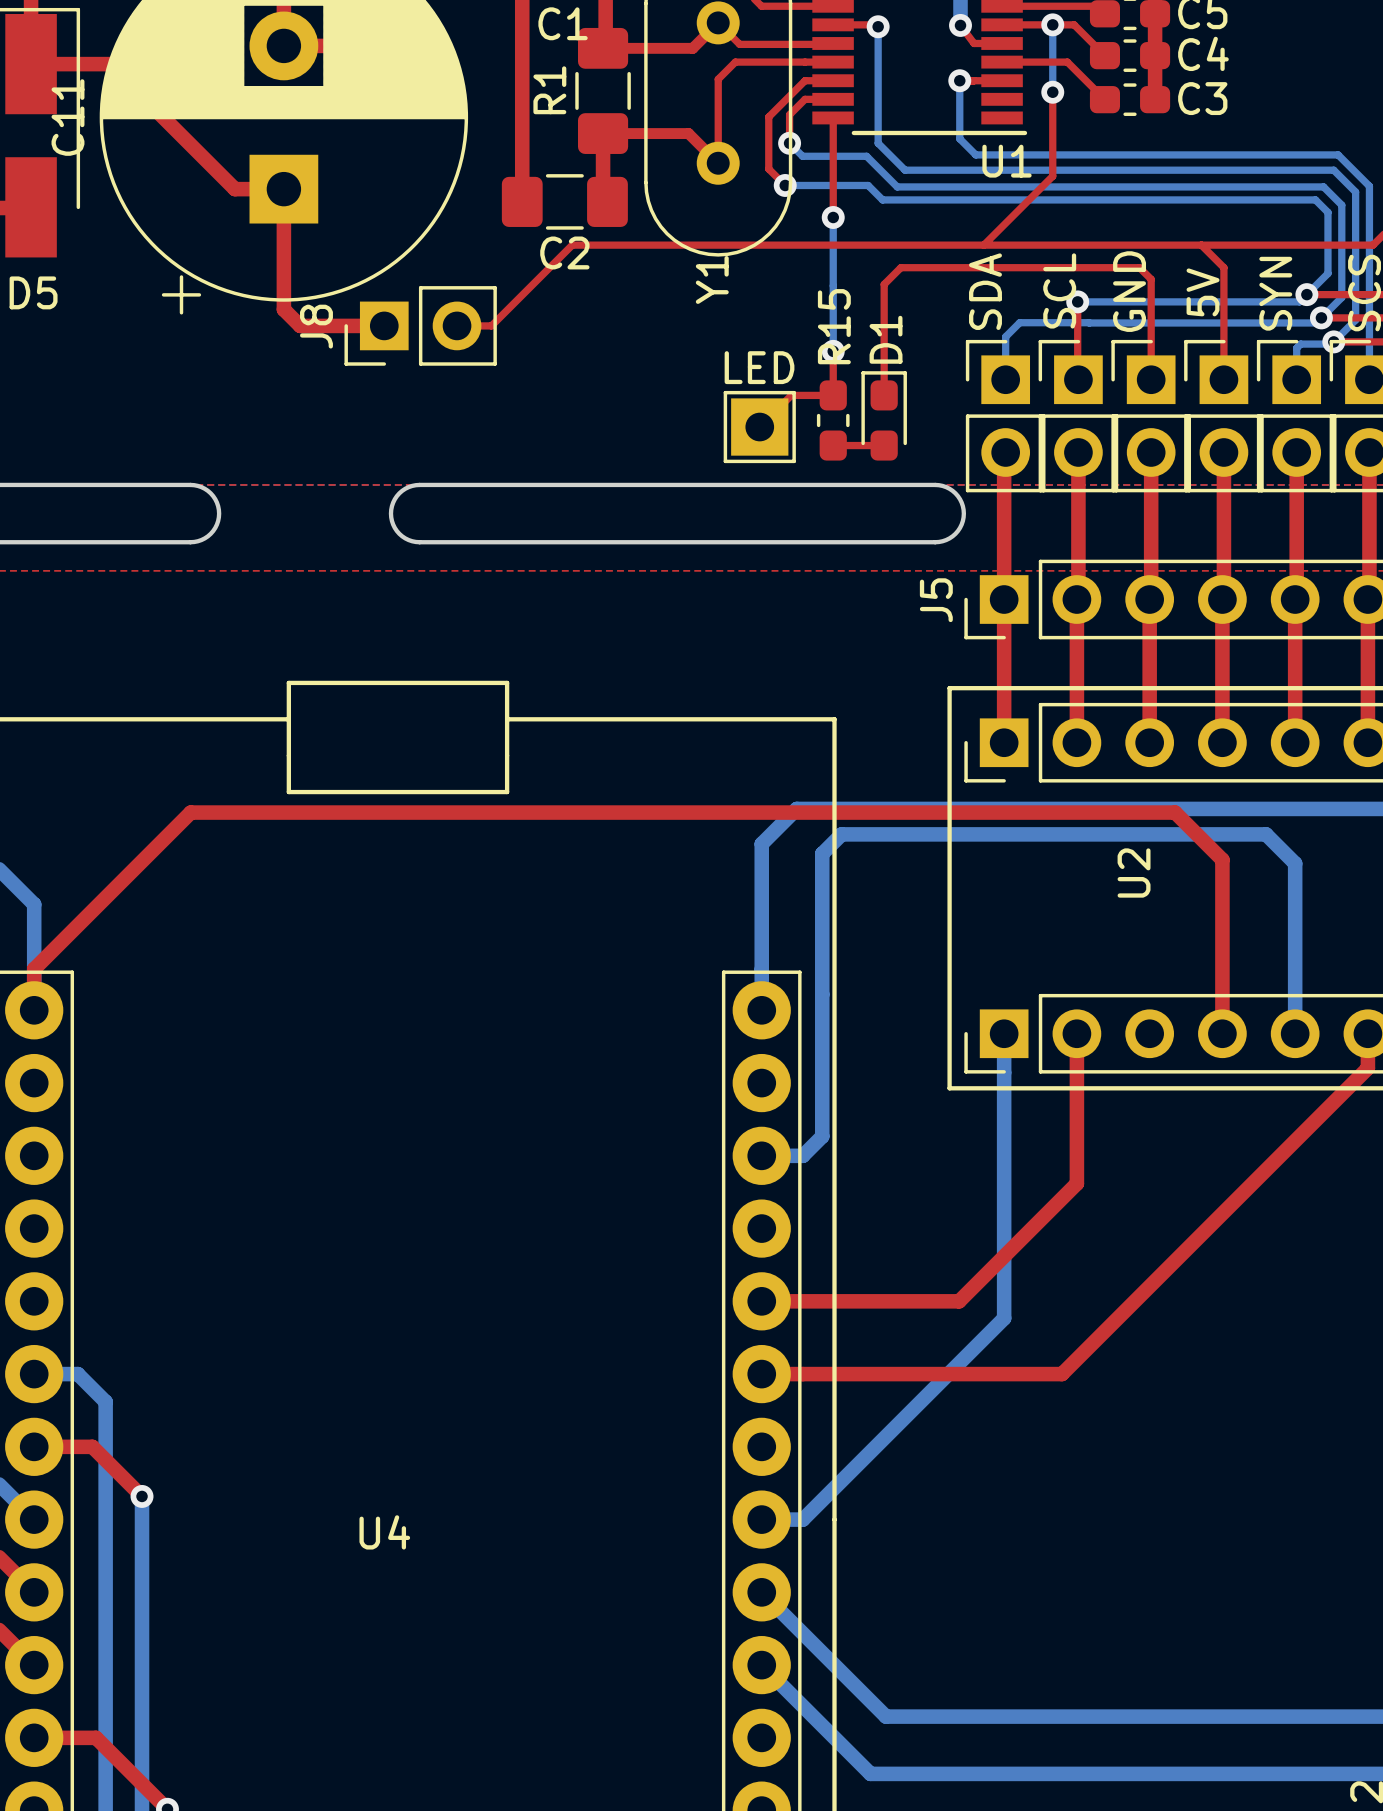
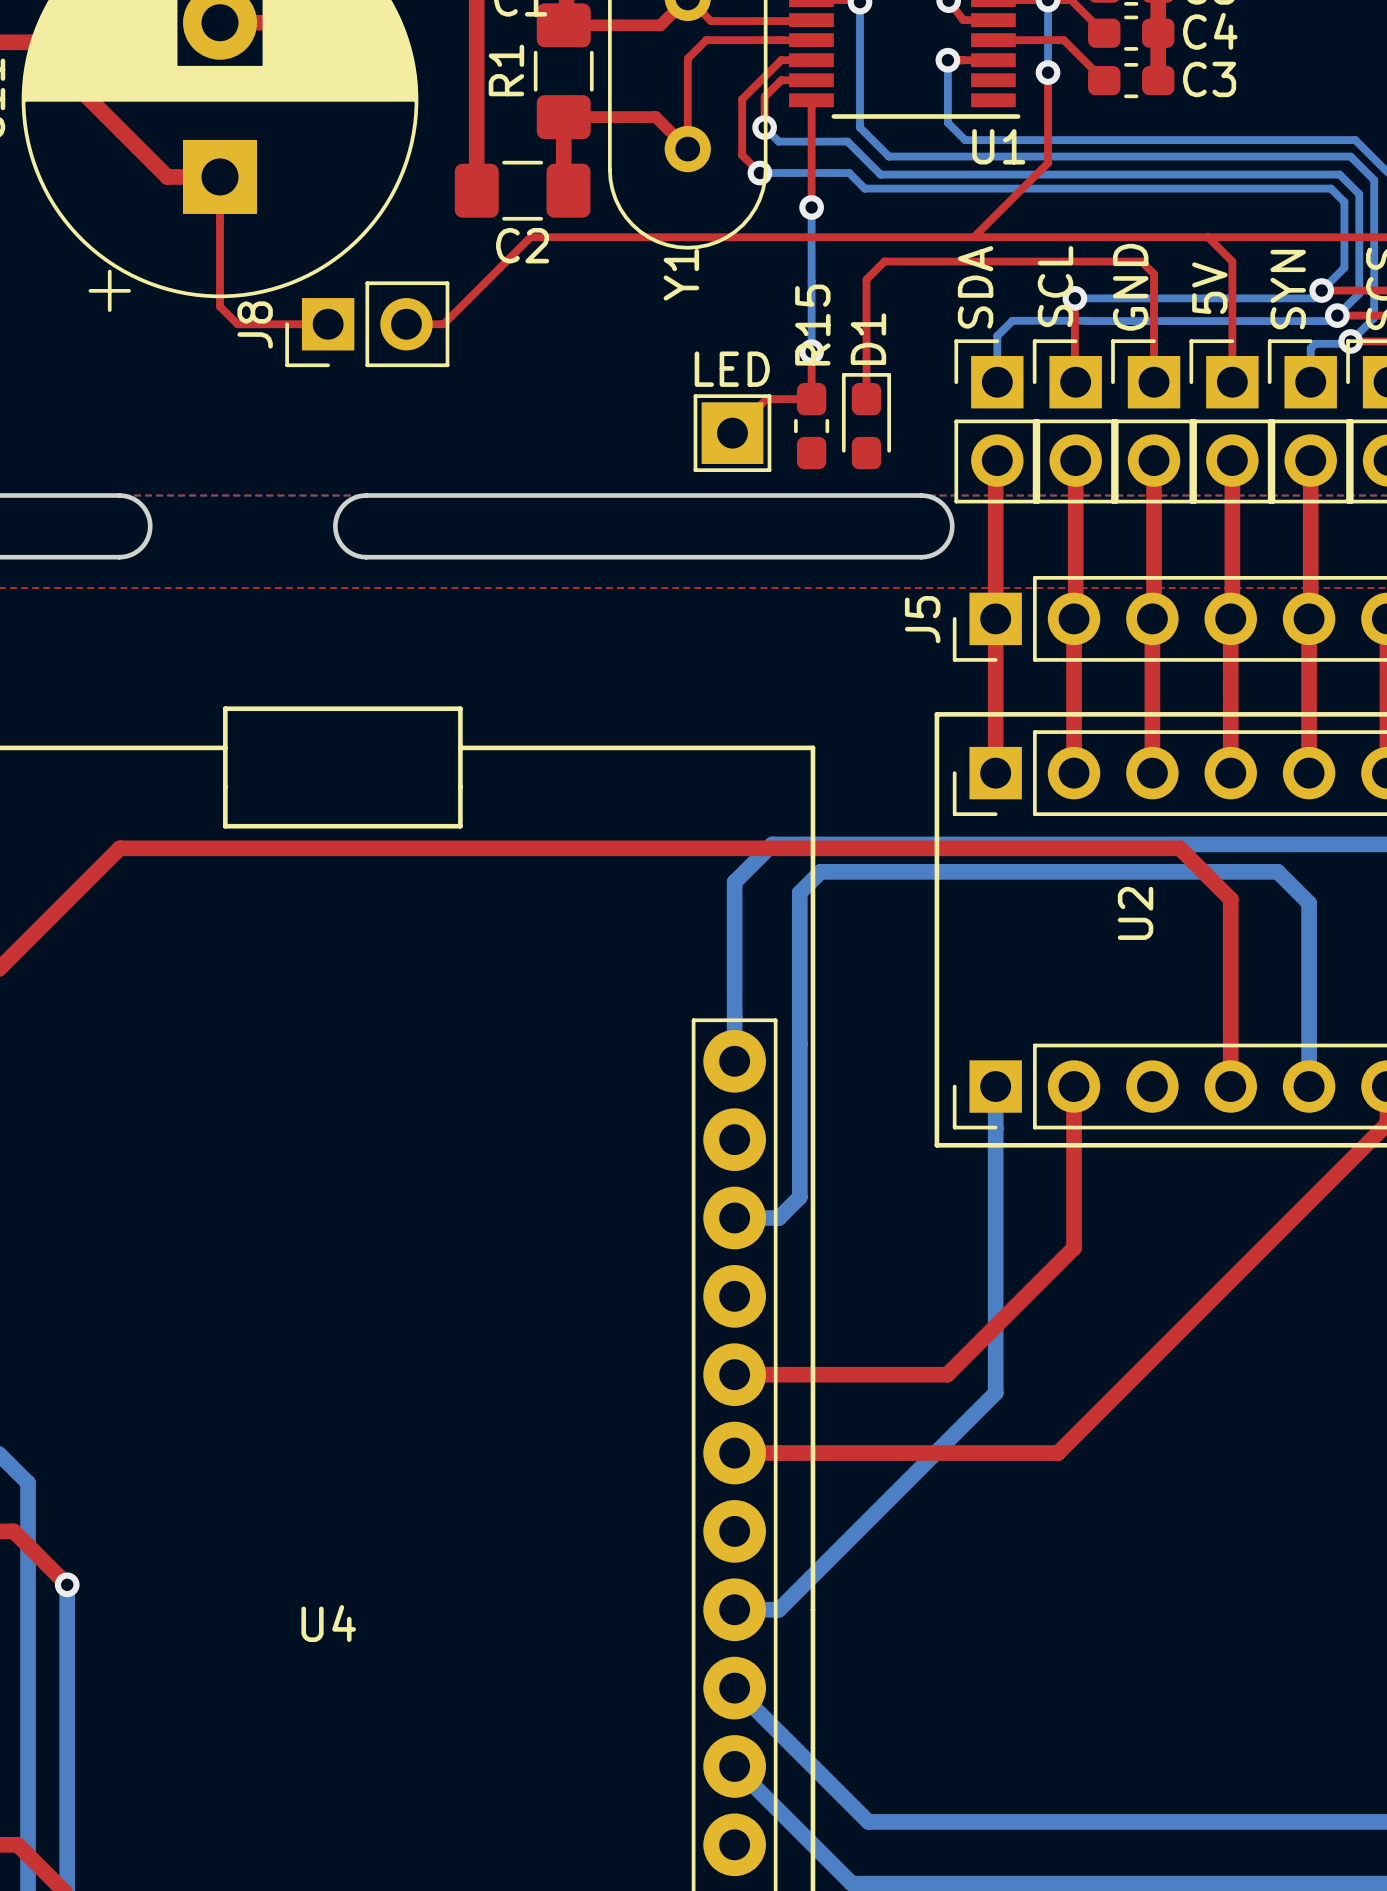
top track width: thick (283, 189) (283, 309) (300, 325) (384, 325) -> thin (220, 176) (220, 306) (237, 324) (328, 324)
top track: (833, 445) (884, 445) -> none

